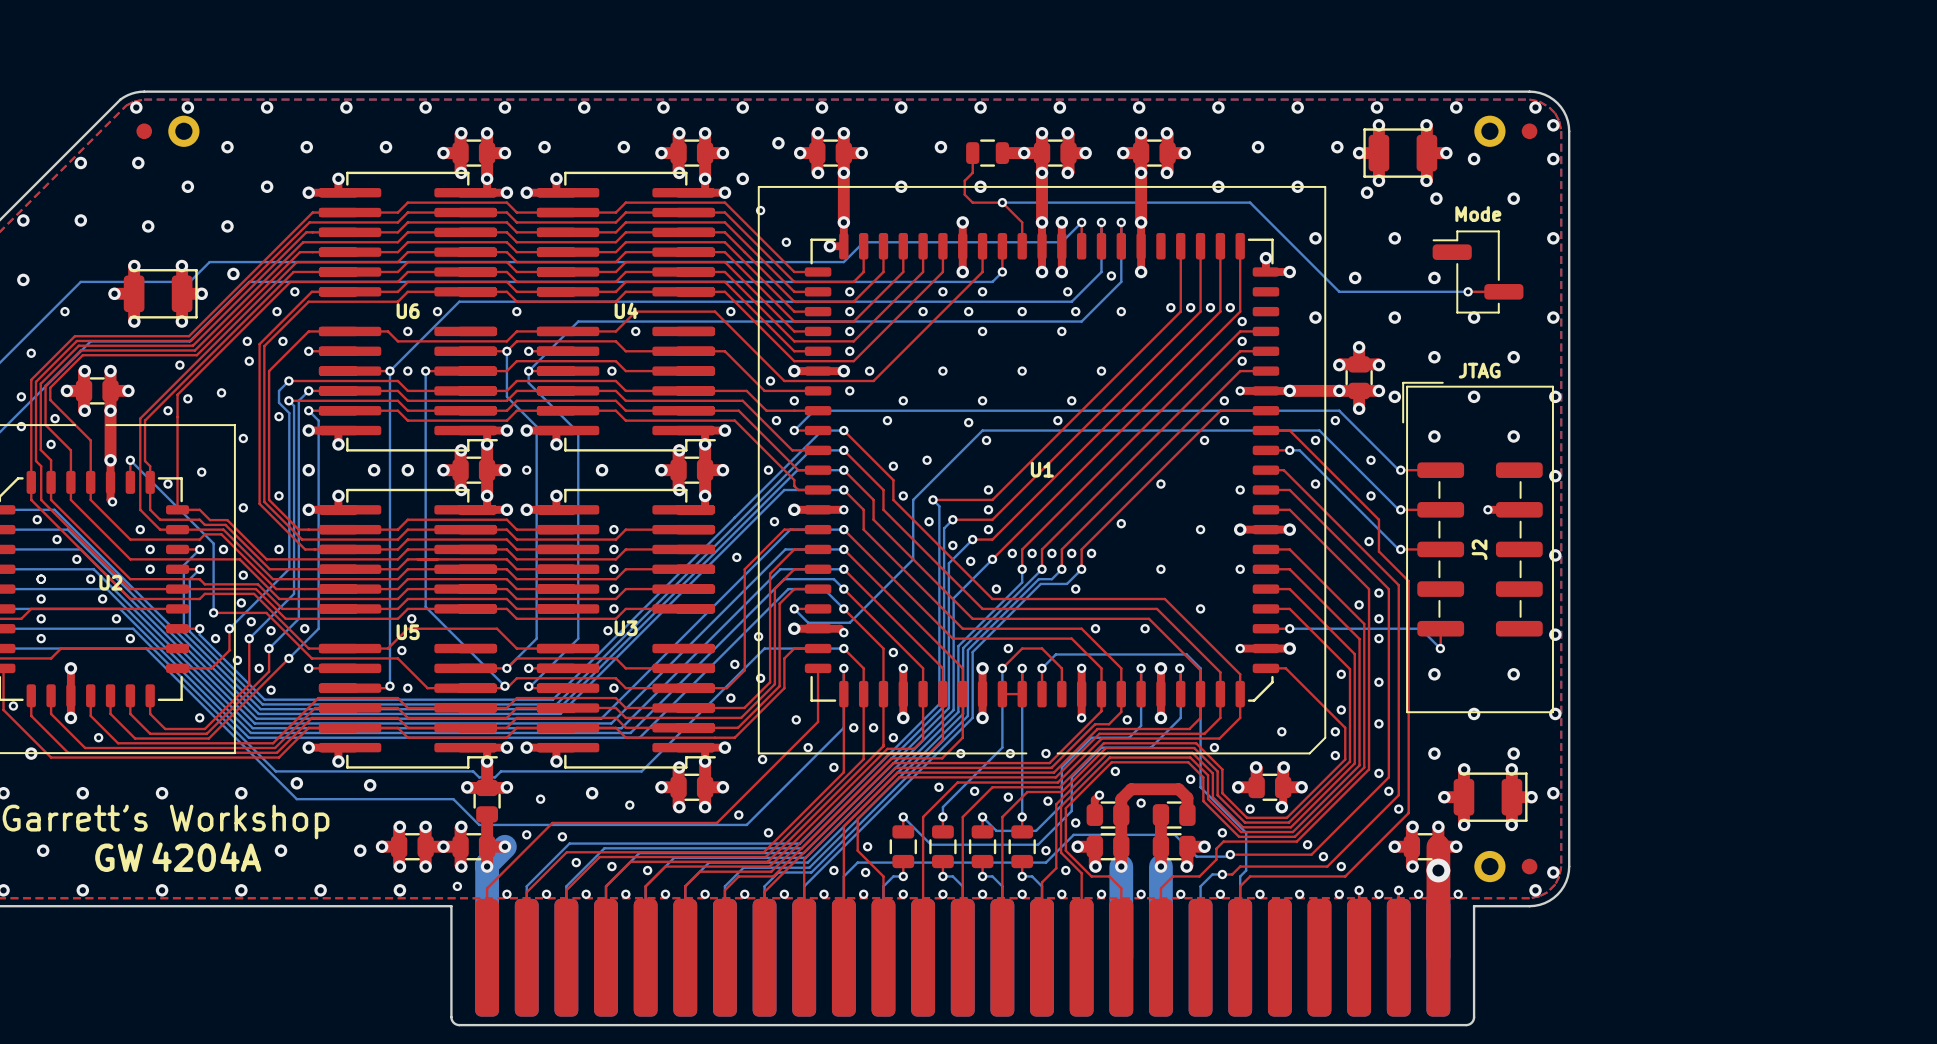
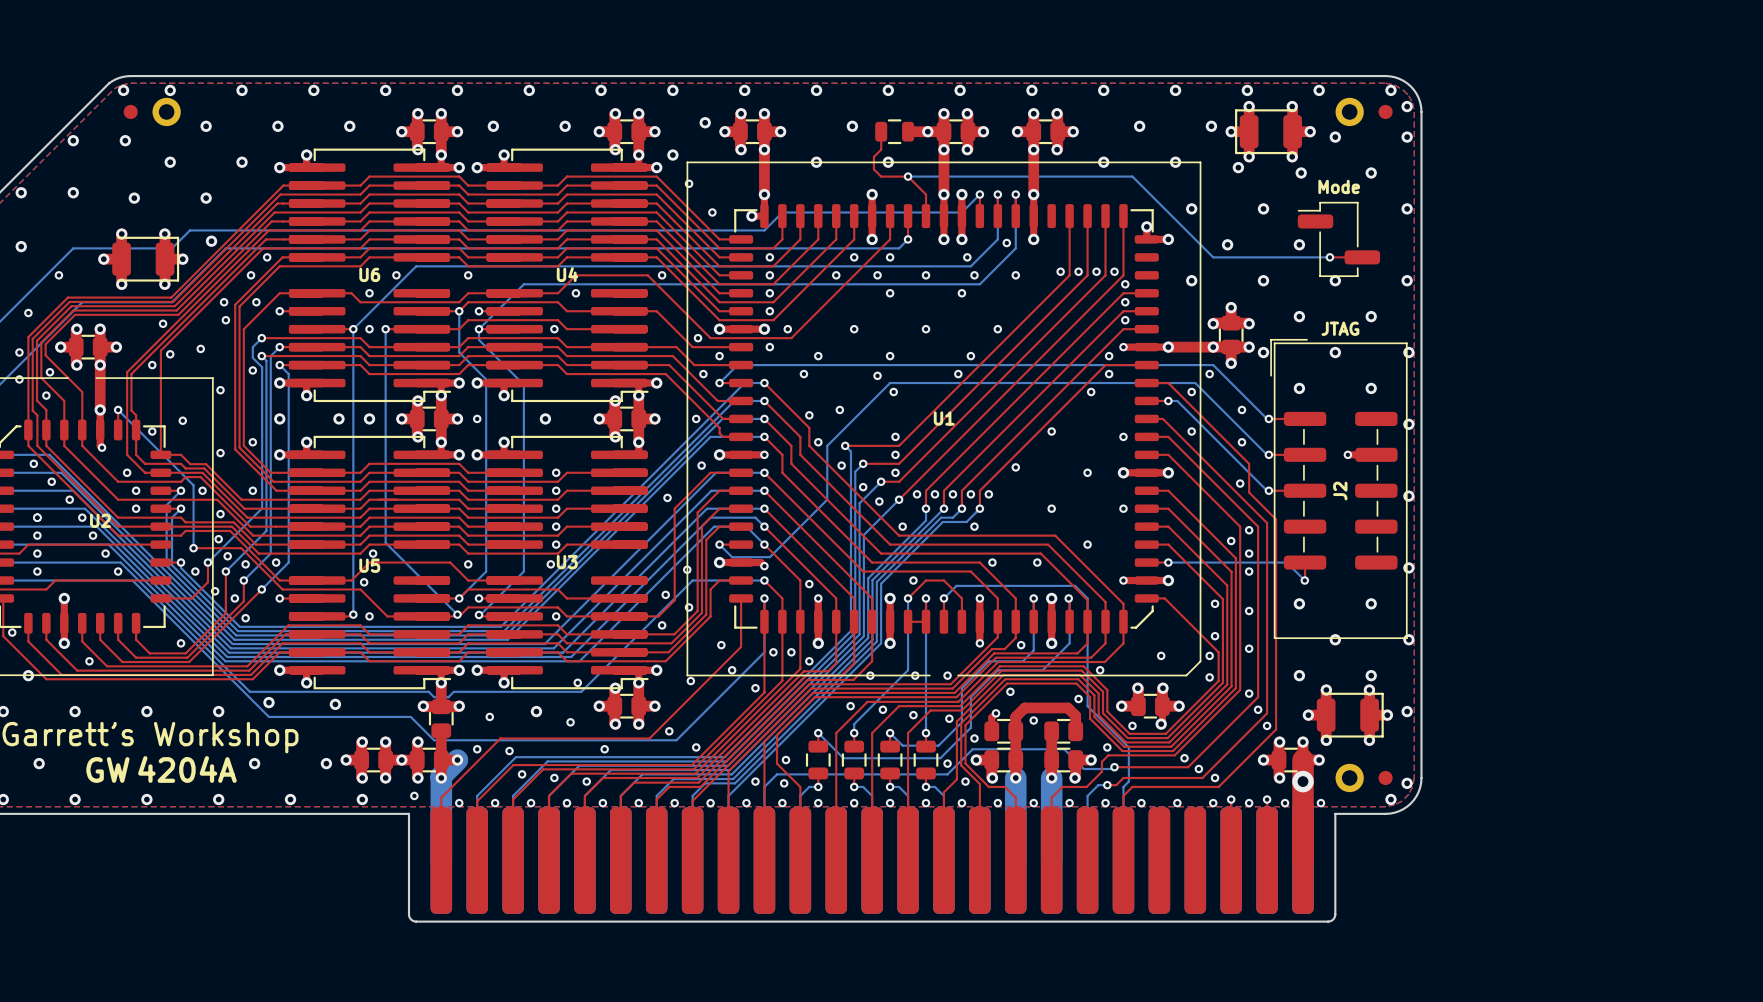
via: none -> (468, 564)
via: none -> (577, 682)
via: none -> (604, 749)

